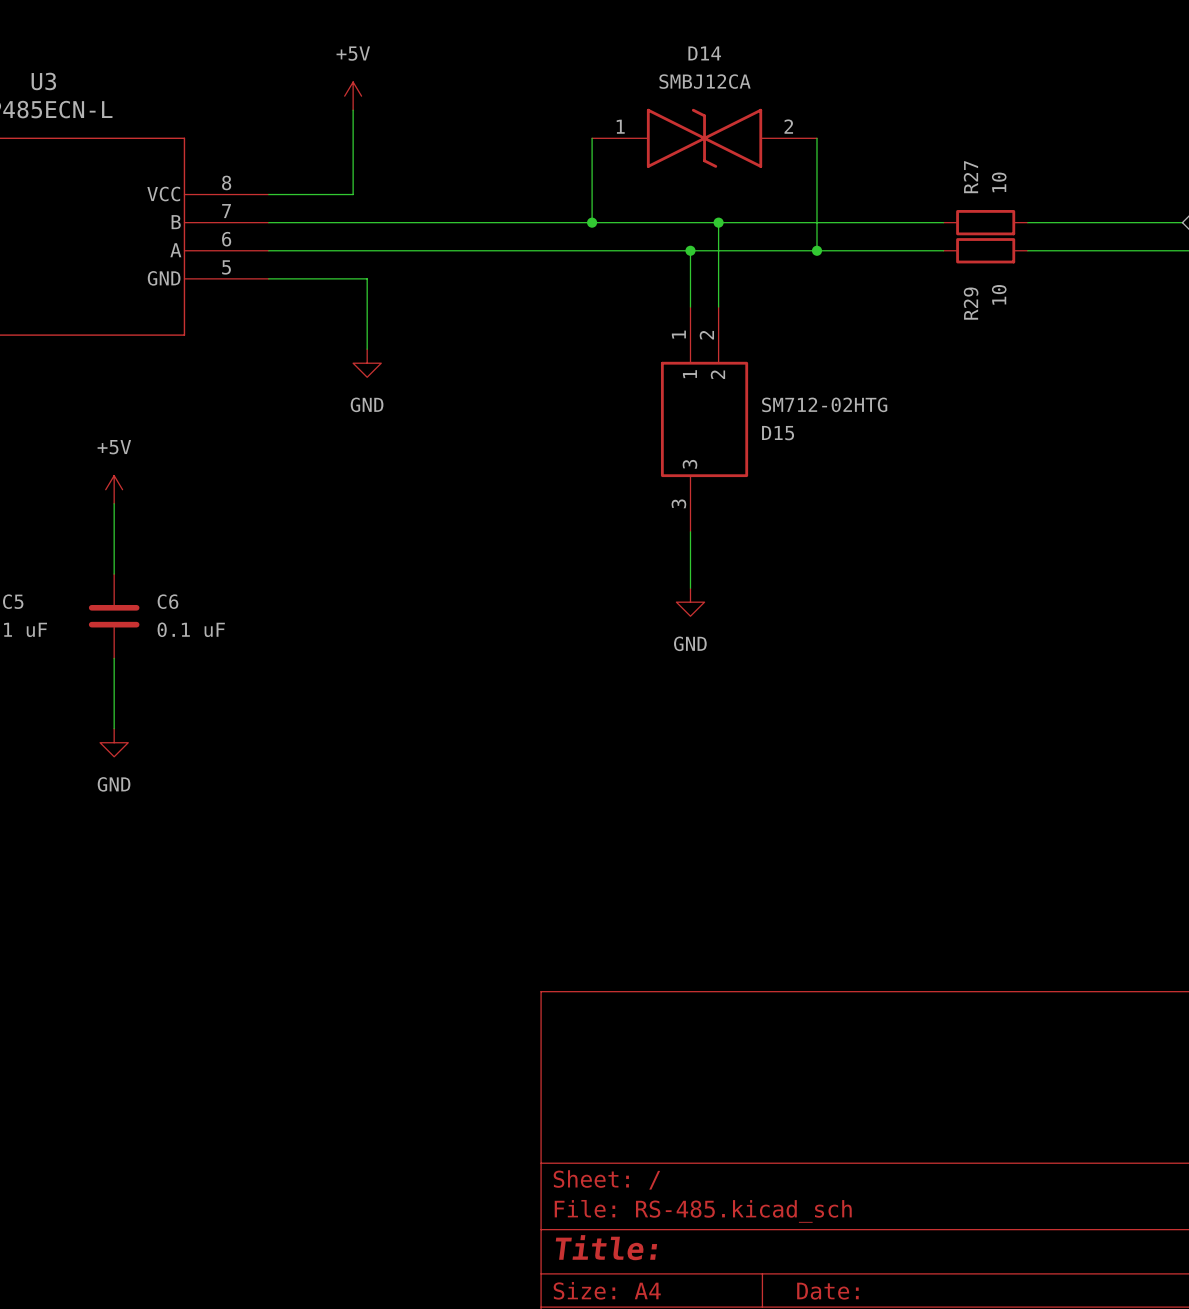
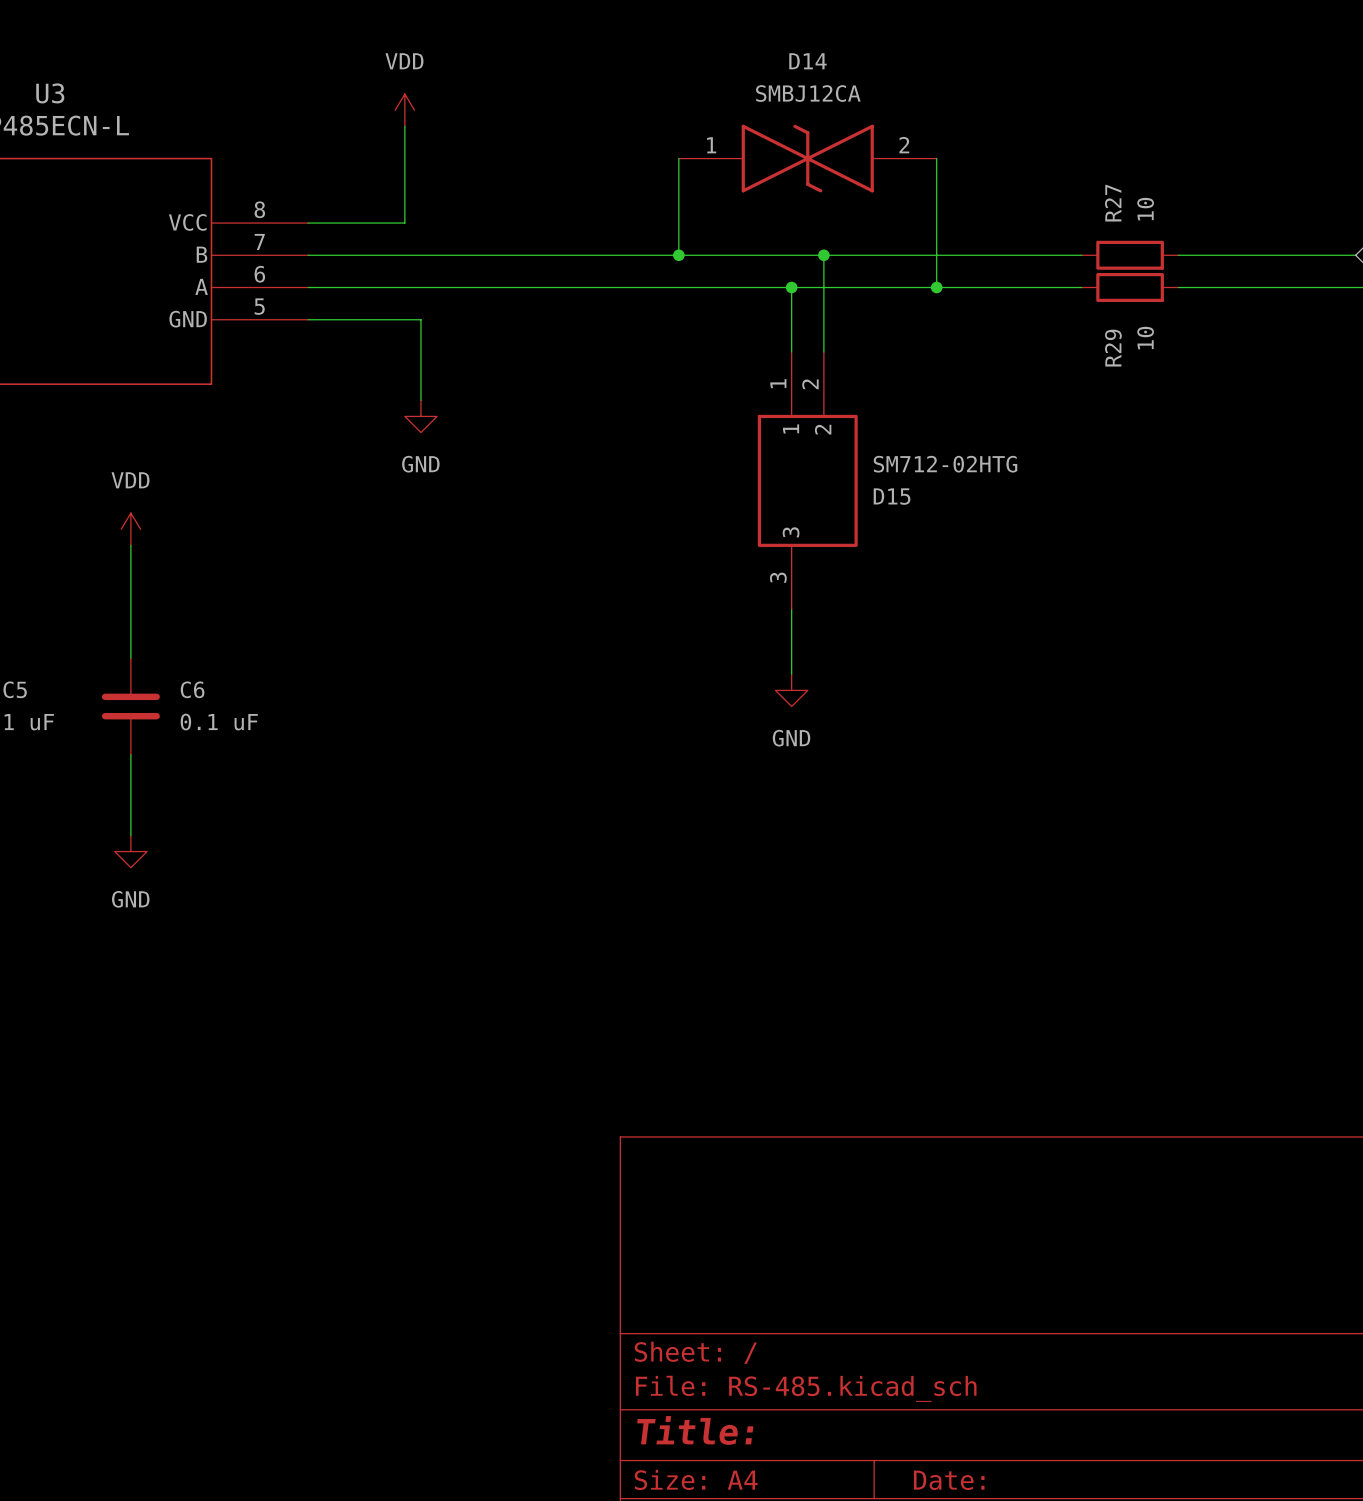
power symbol: +5V (353, 96) -> VDD (404, 110)
power symbol: none -> VDD (130, 529)
power symbol: +5V (114, 489) -> none

